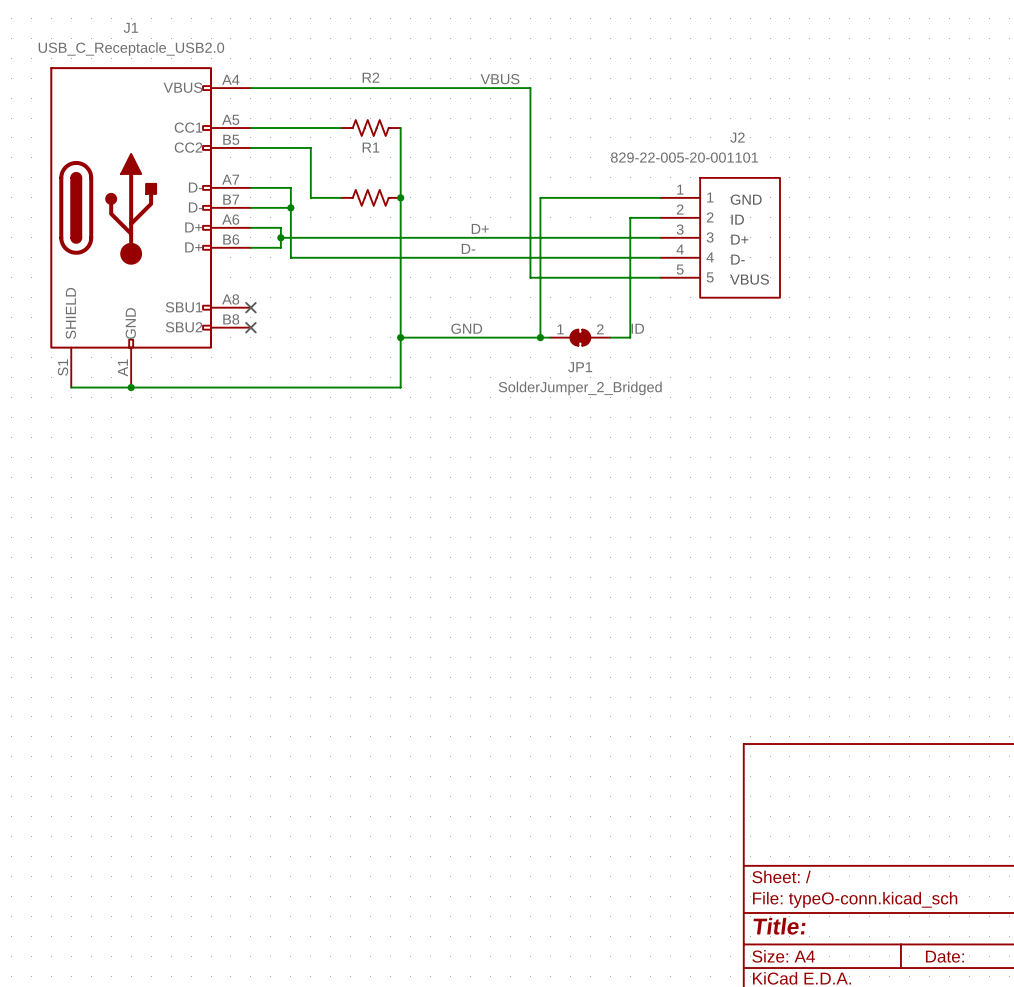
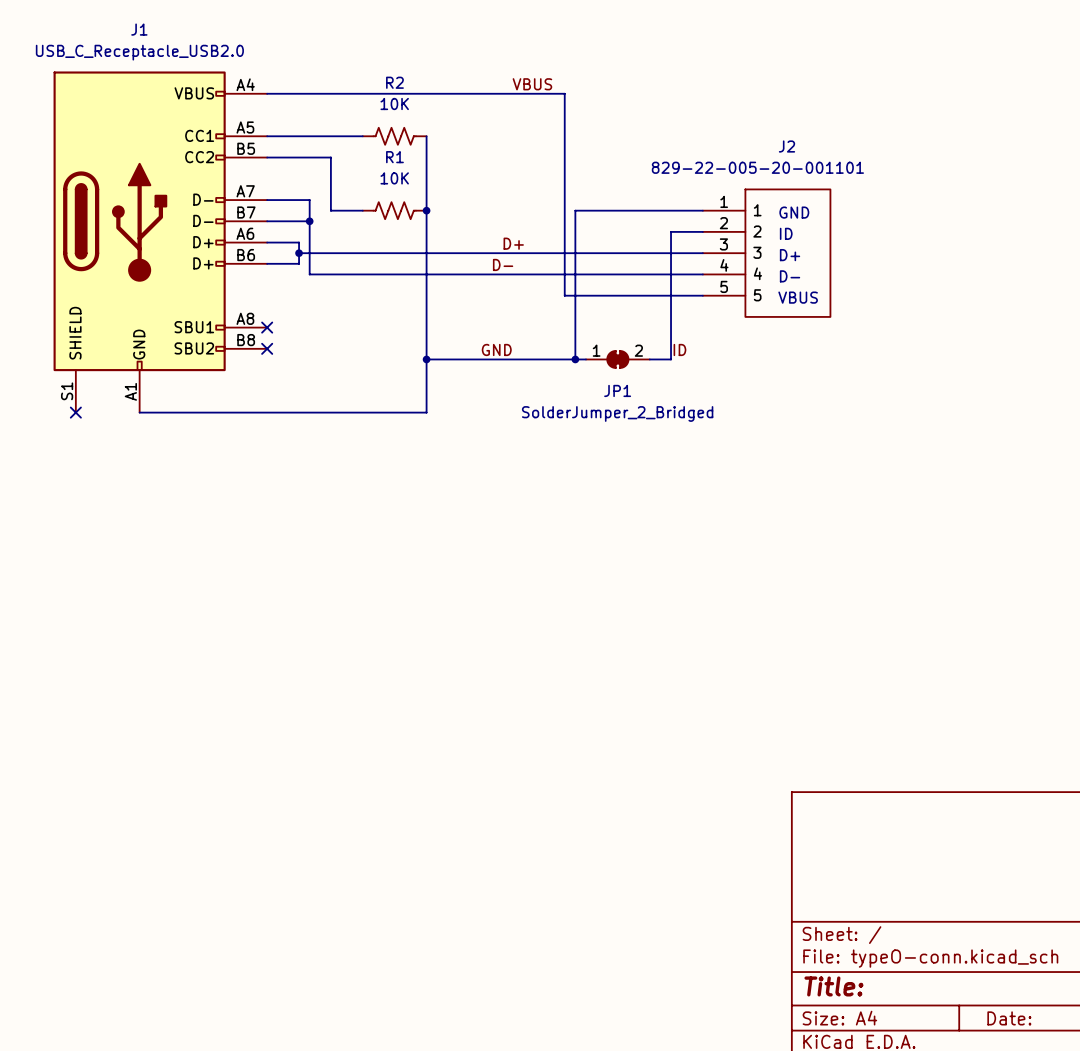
R2 value: none -> 10K (394, 104)
R1 value: none -> 10K (394, 178)
wire: (71, 387) (131, 387) -> none
no-connect mark: none -> (75, 412)
junction: (131, 387) -> none

